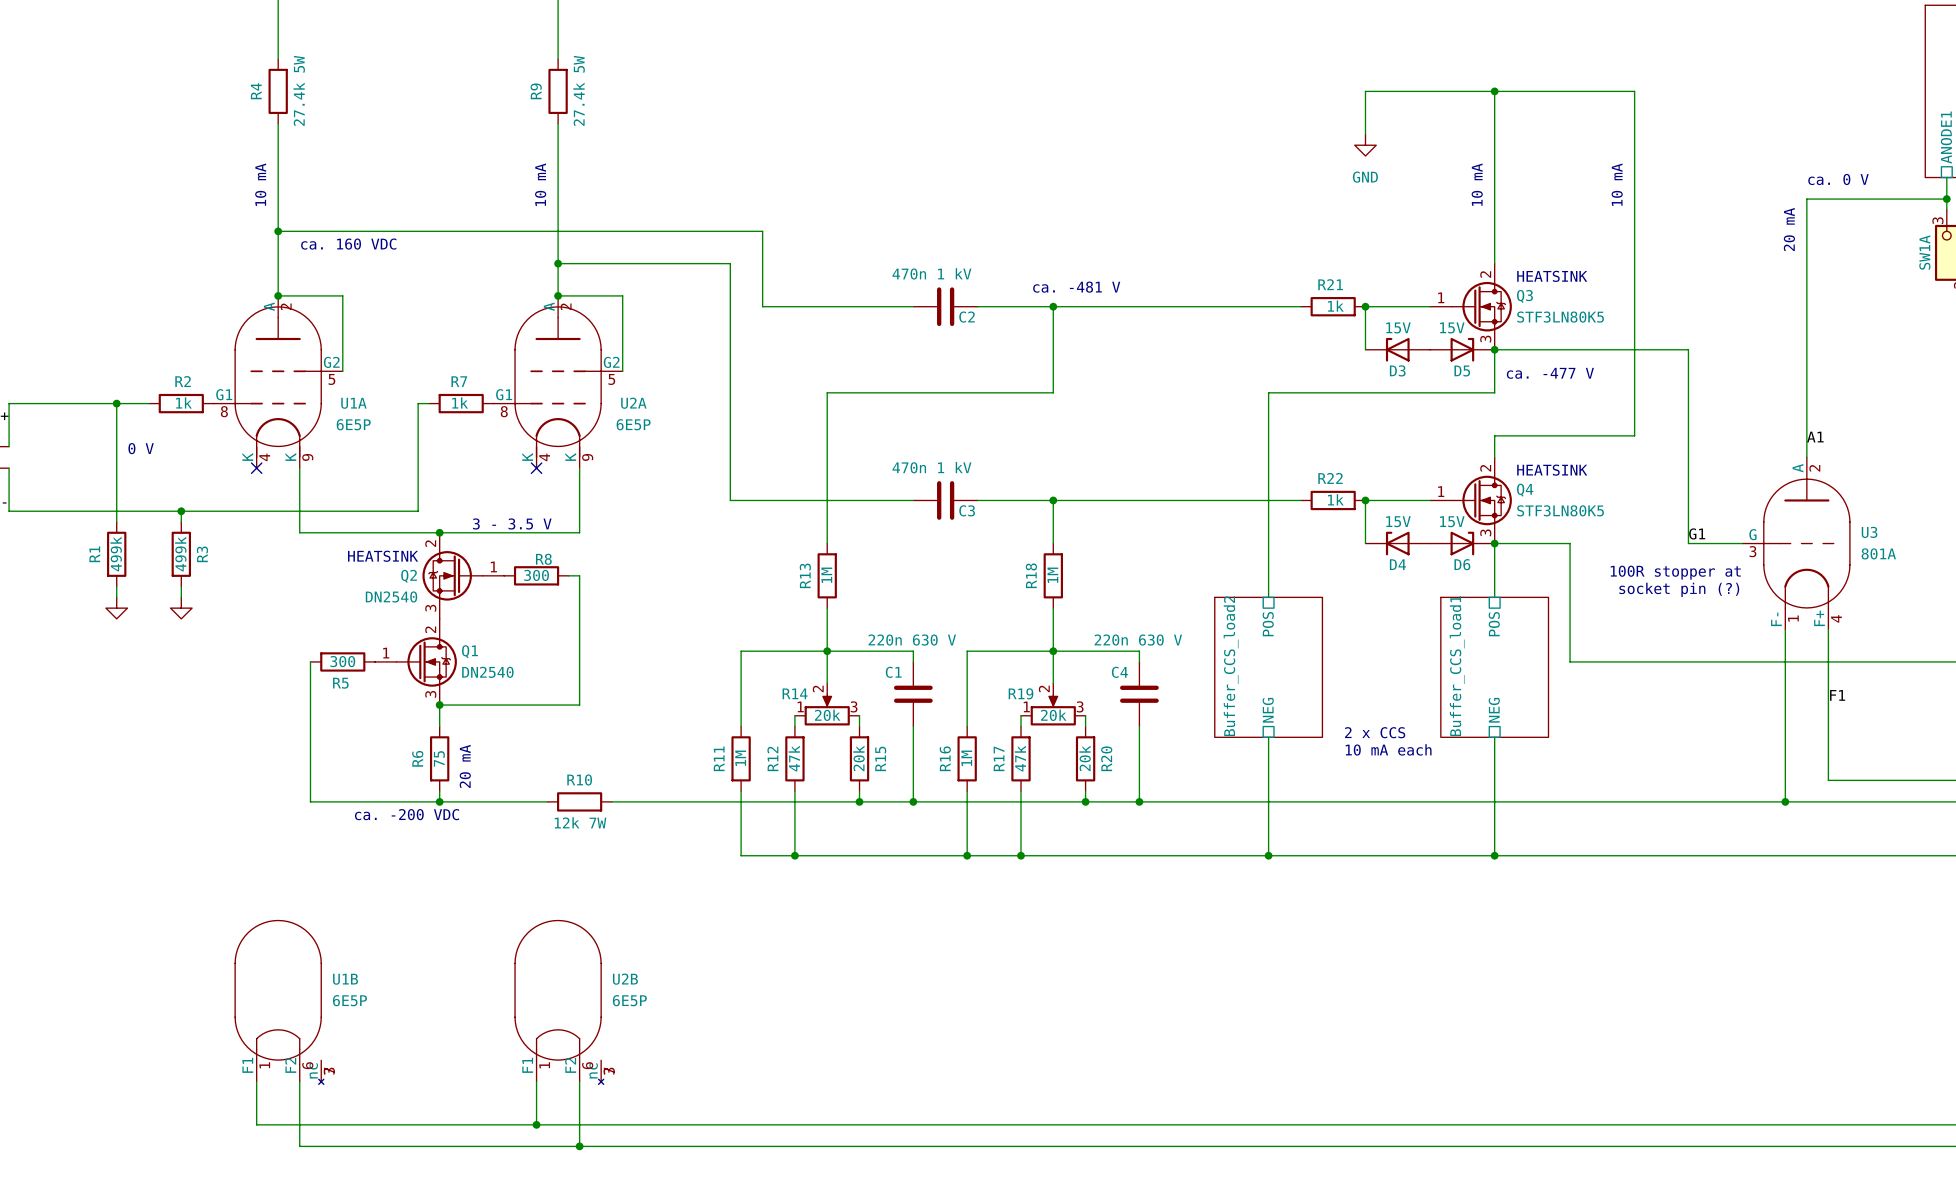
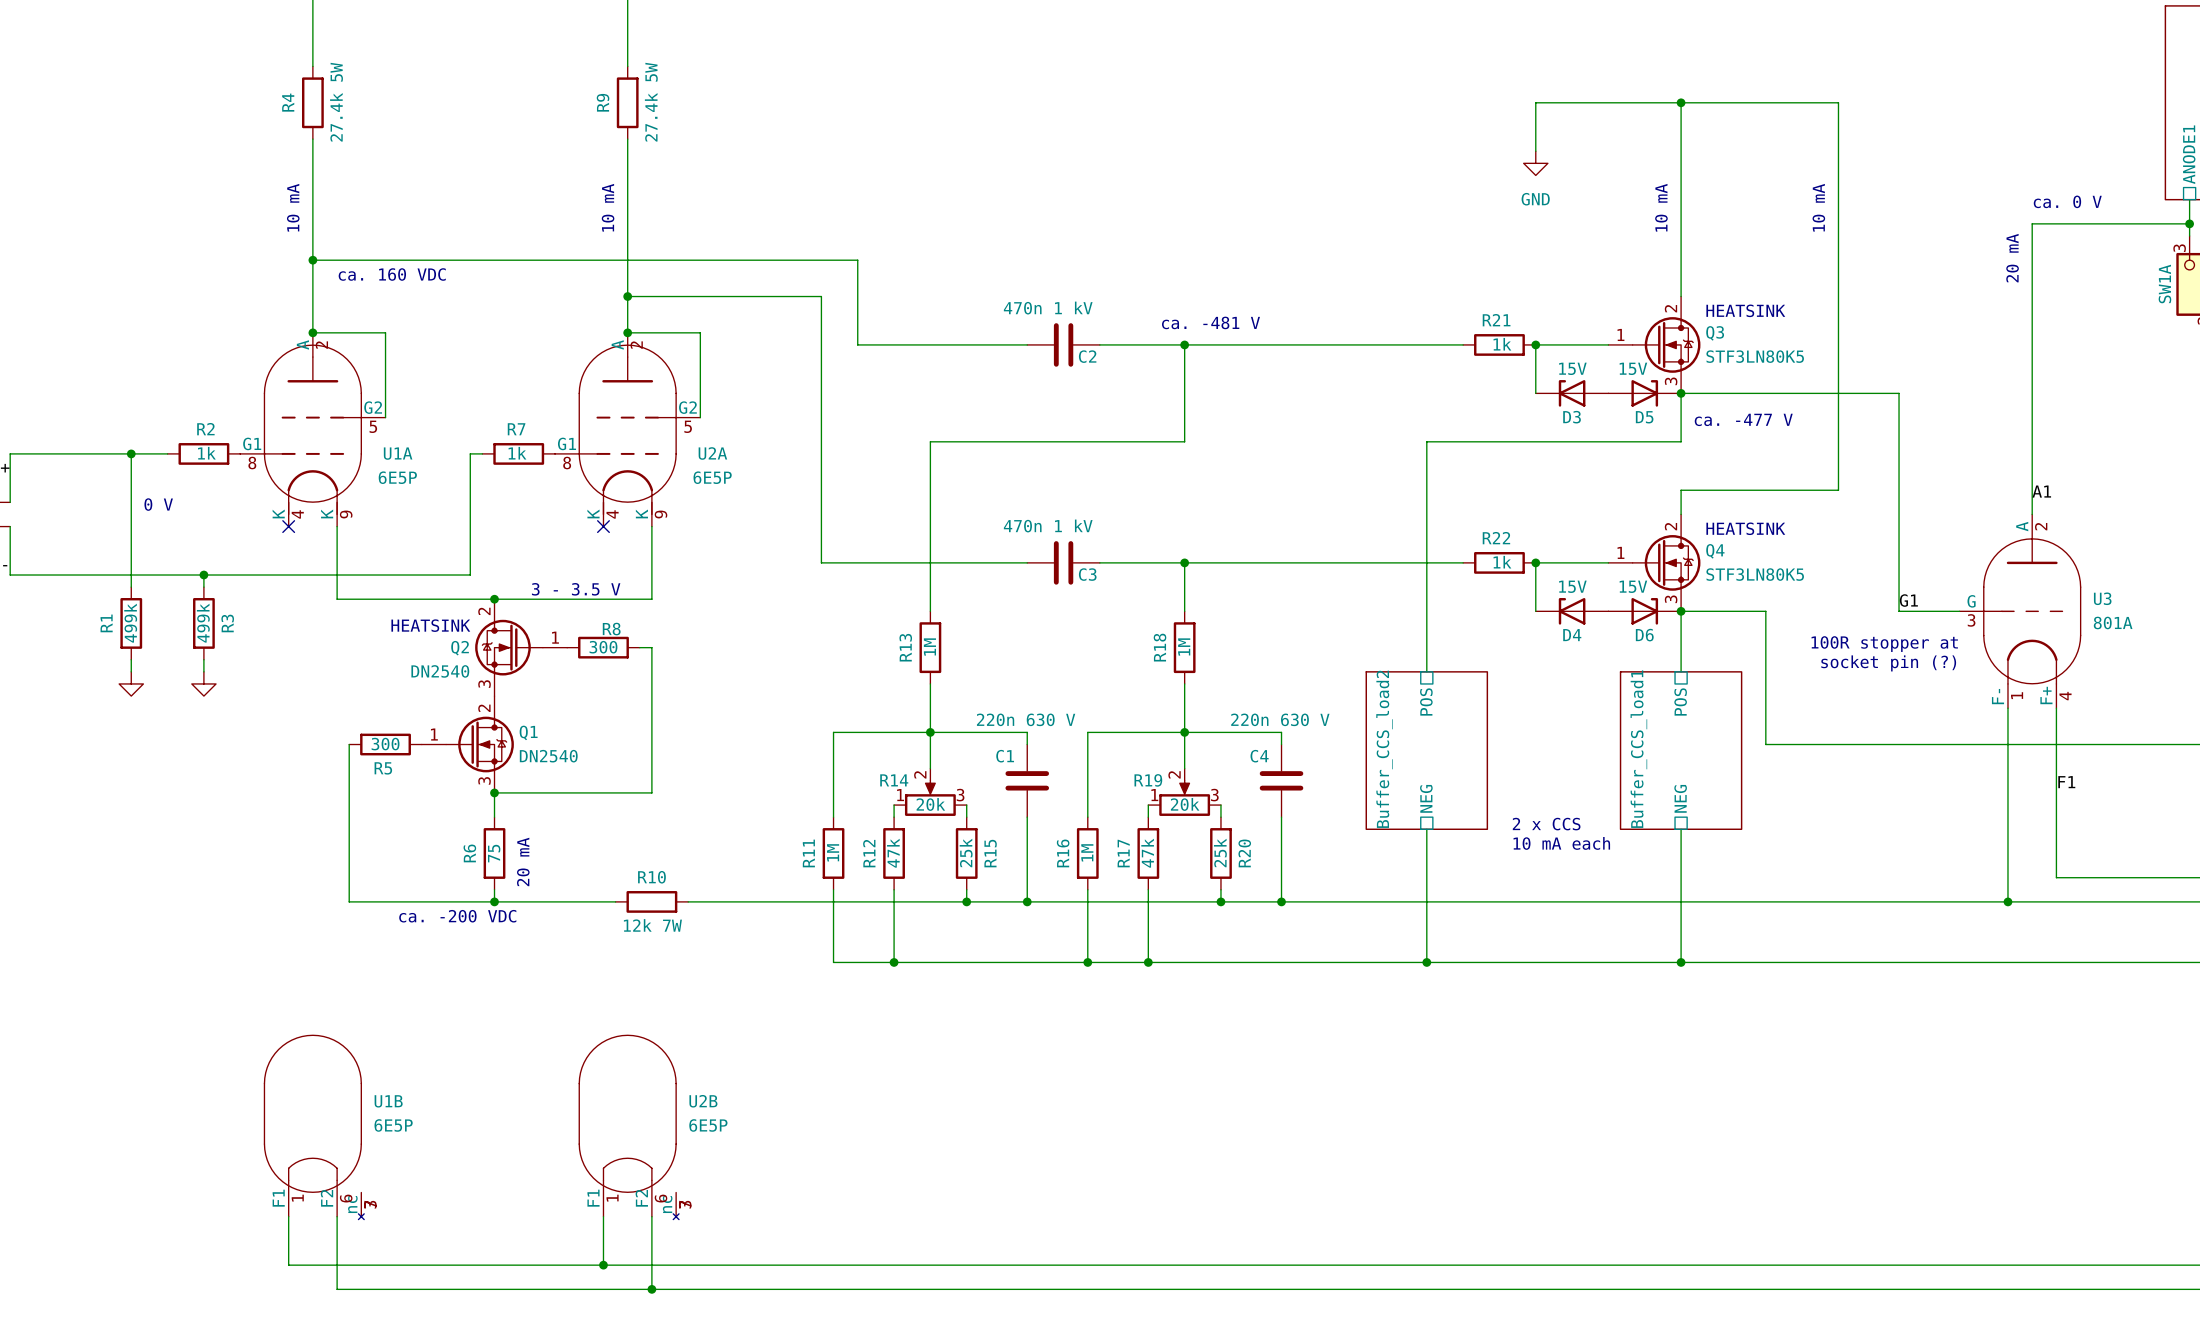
R15 value: 20k (858, 758) -> 25k (966, 852)
R20 value: 20k (1085, 758) -> 25k (1220, 852)

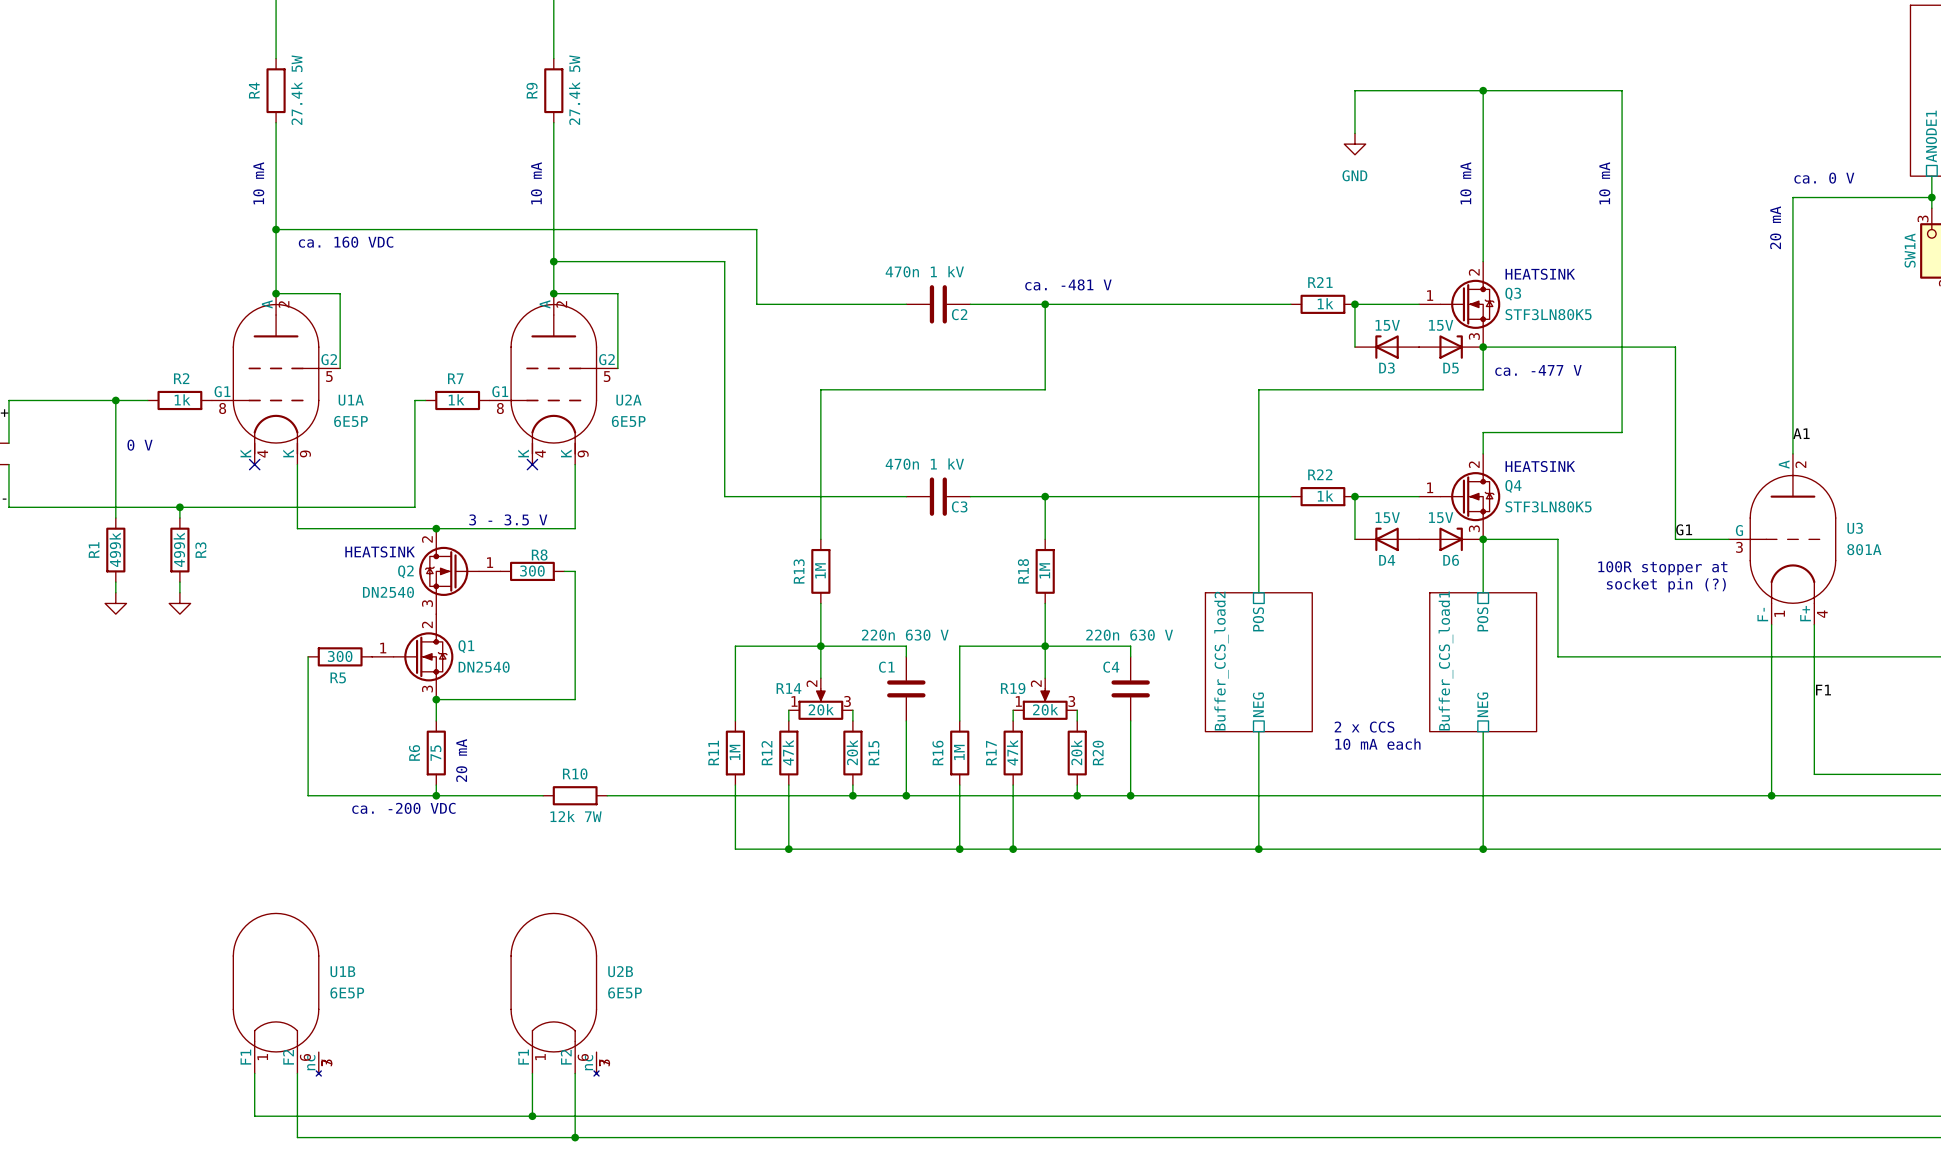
R15 value: 25k (966, 852) -> 20k (852, 752)
R20 value: 25k (1220, 852) -> 20k (1076, 752)

